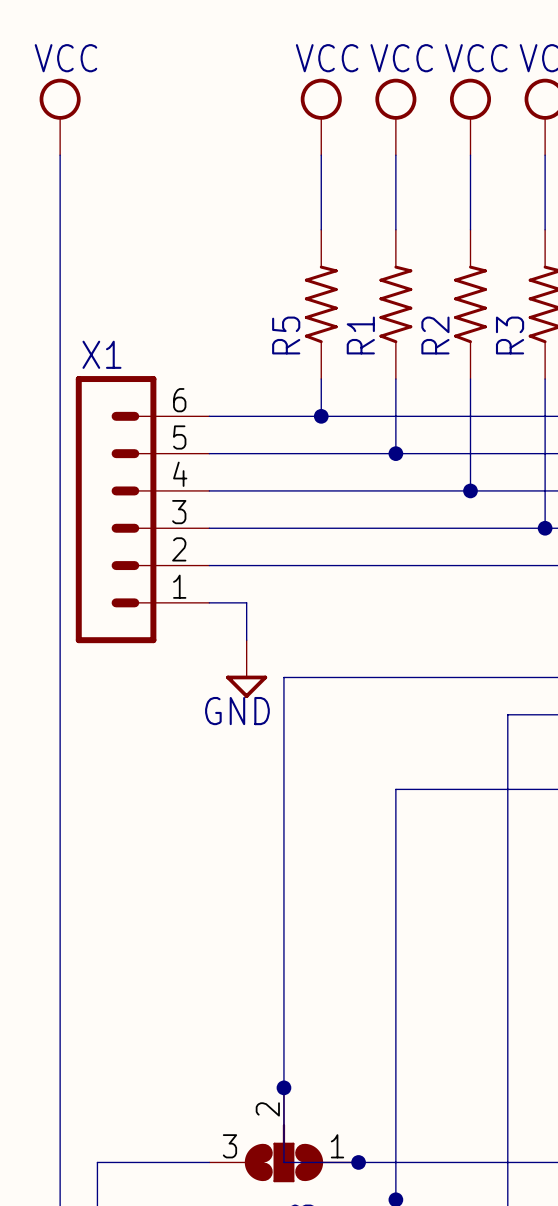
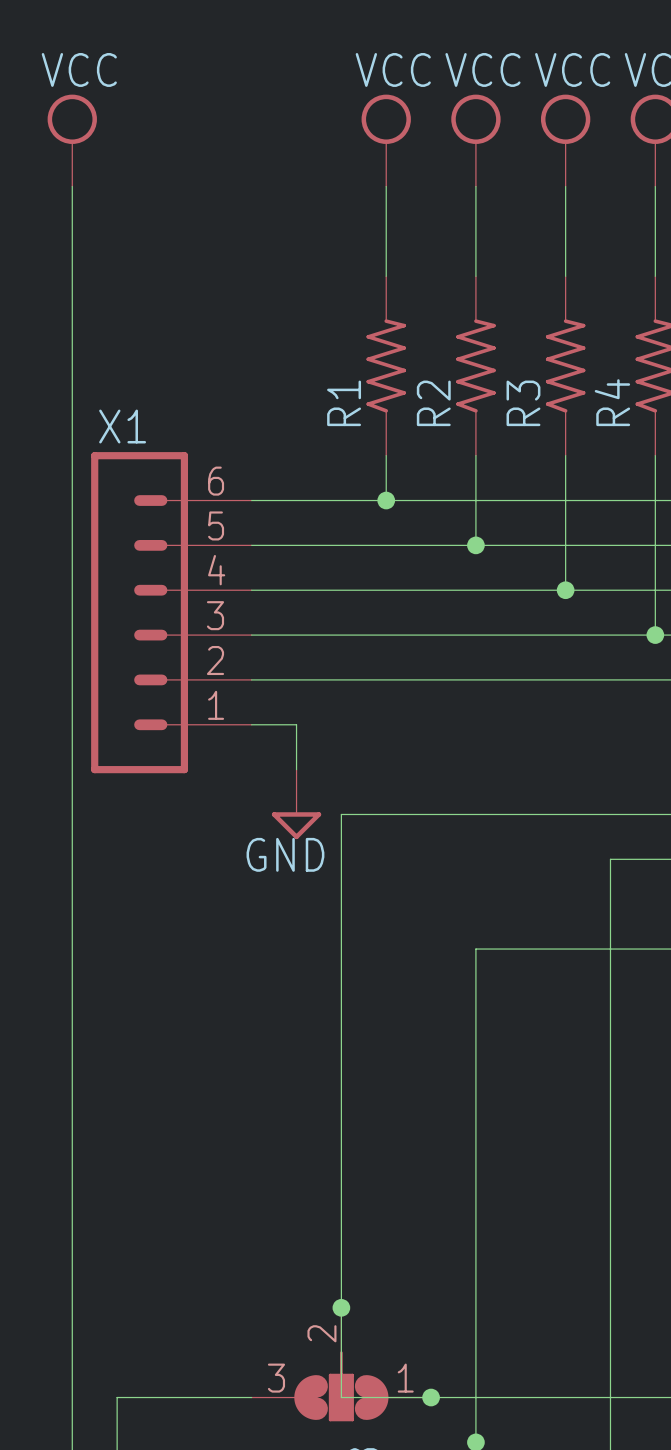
R5 name: R5 (286, 335) -> R1 (344, 403)
R1 name: R1 (360, 335) -> R2 (433, 403)
R2 name: R2 (435, 335) -> R3 (523, 403)
R3 name: R3 (510, 335) -> R4 (612, 402)

